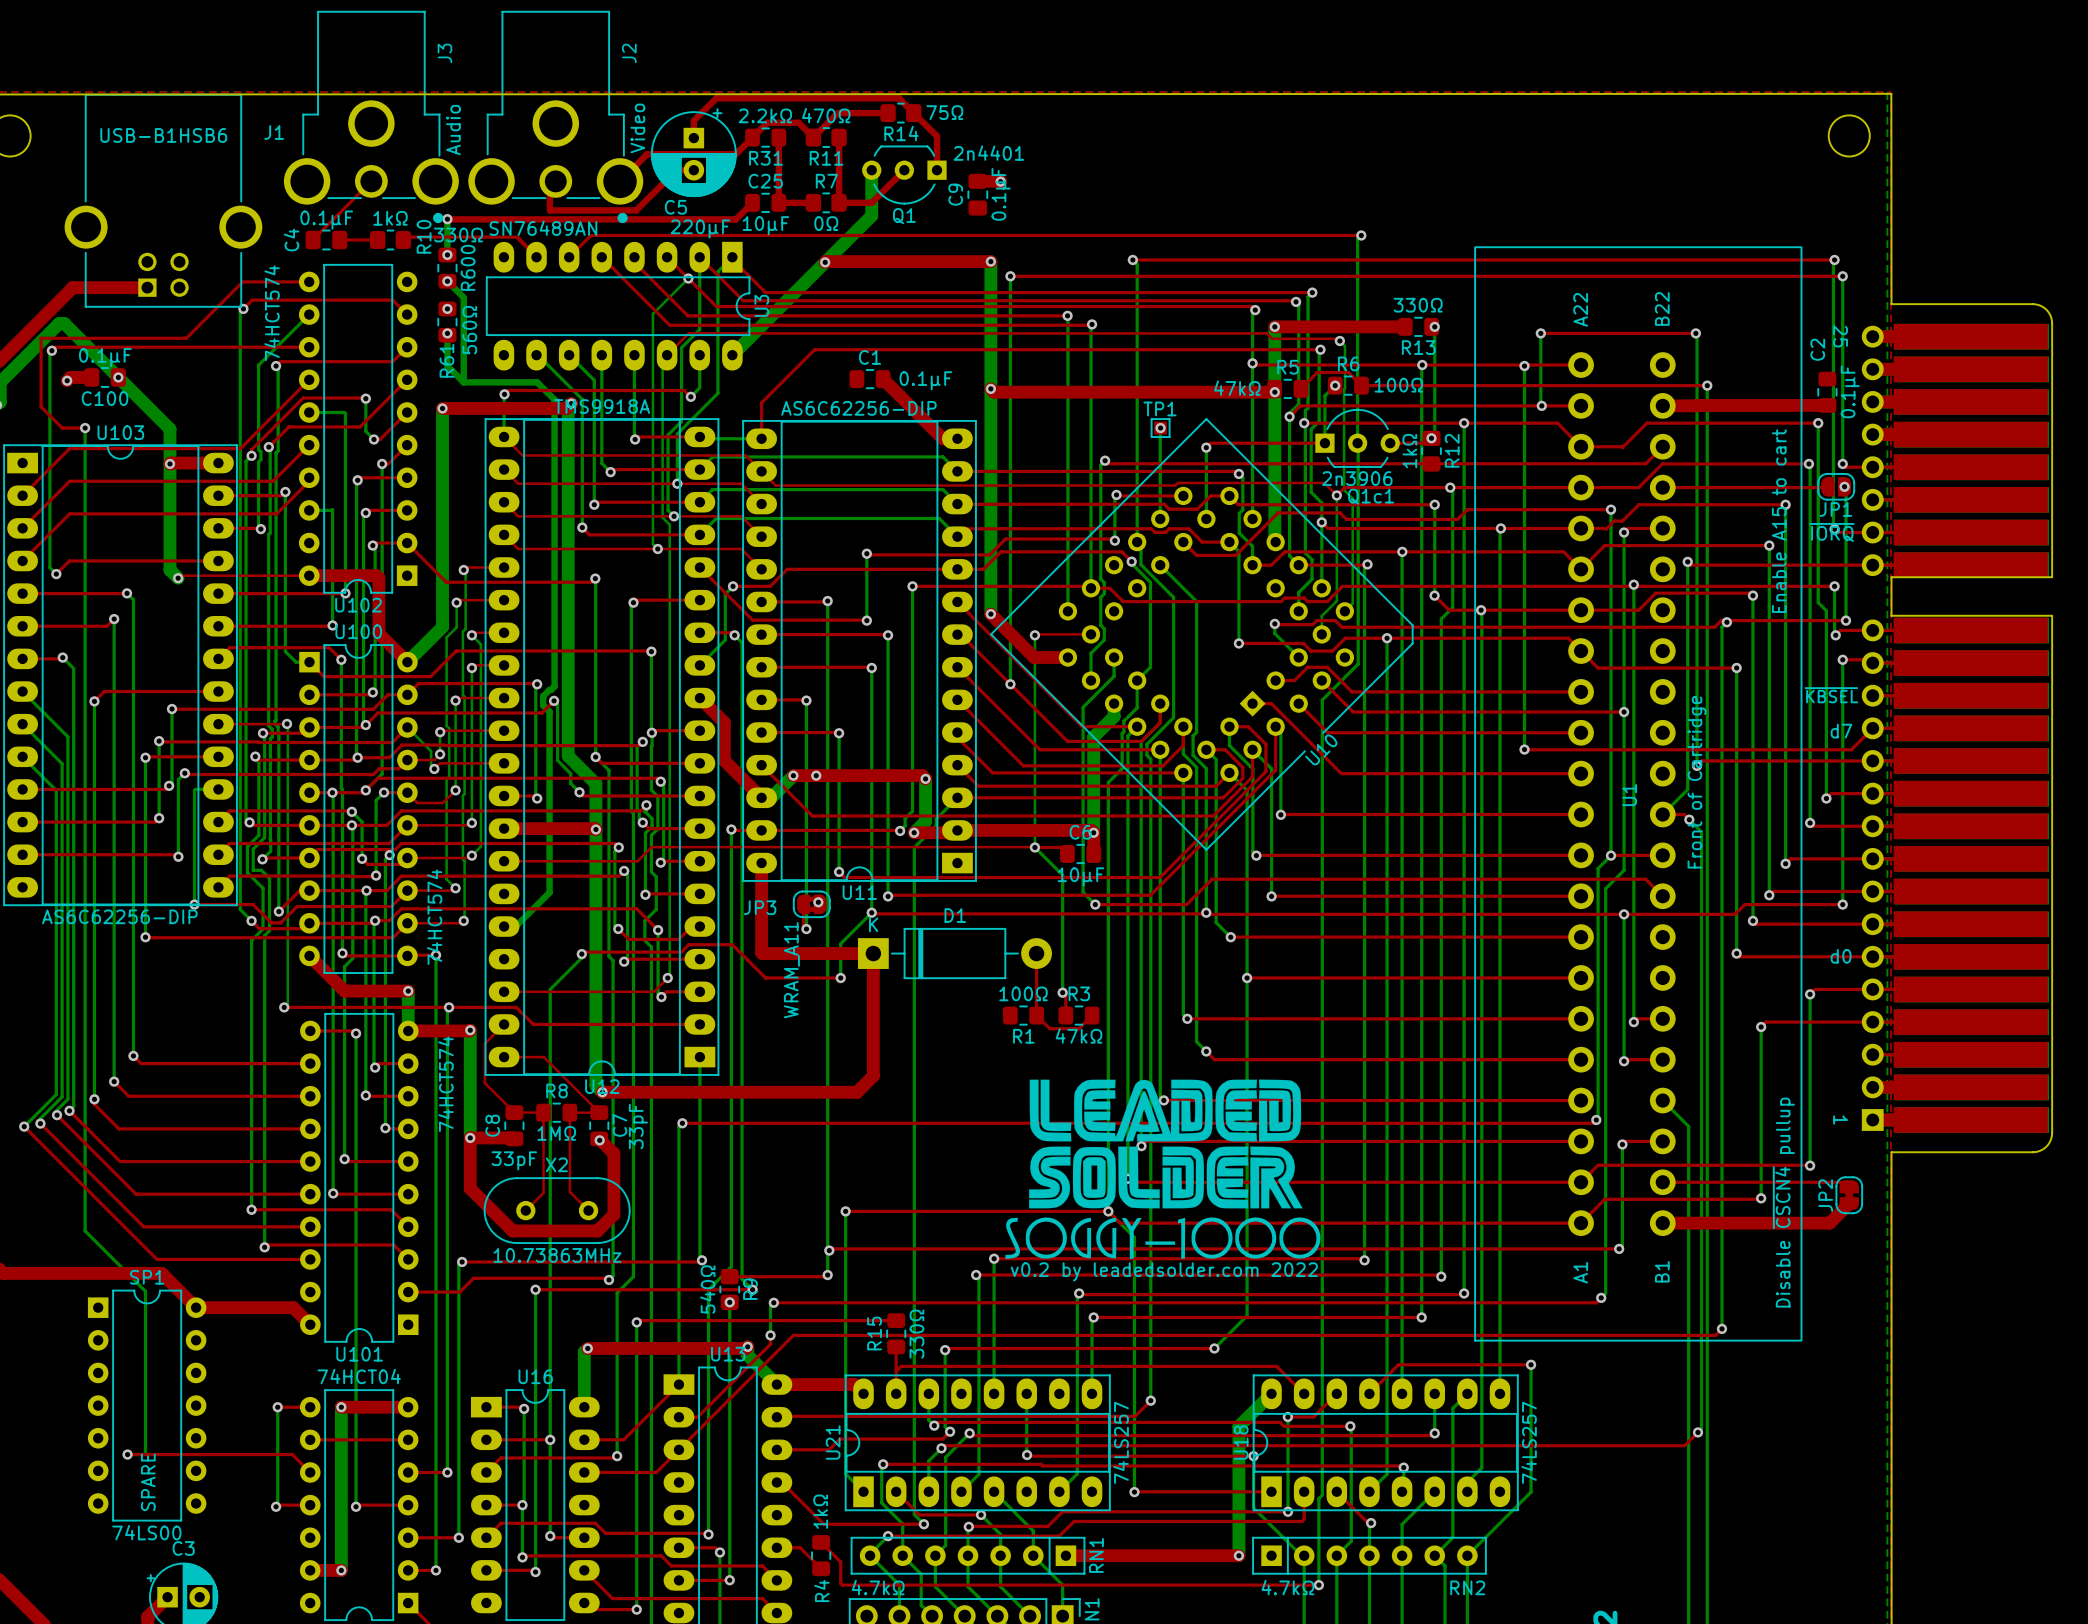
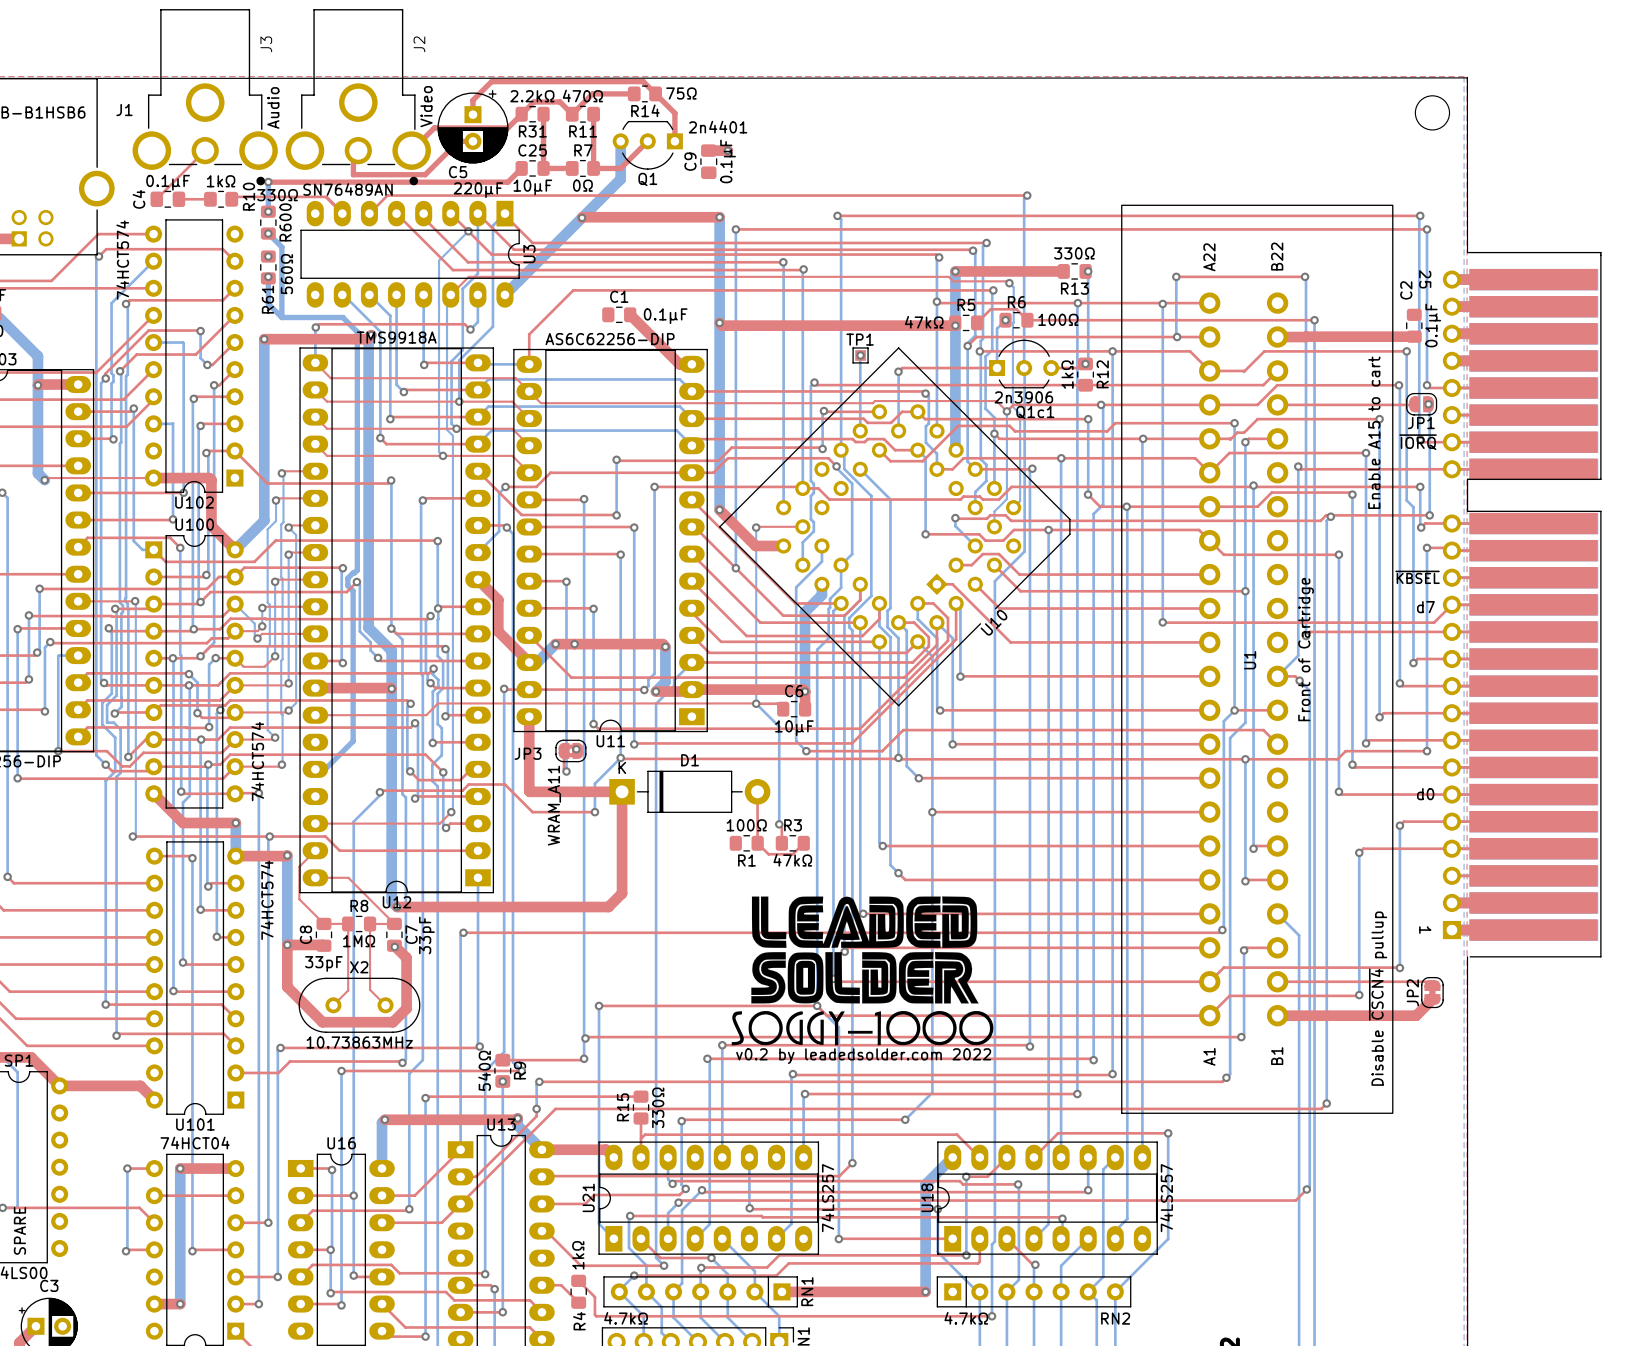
part footprint: [1861, 303, 2053, 1154] -> [1442, 251, 1602, 958]

